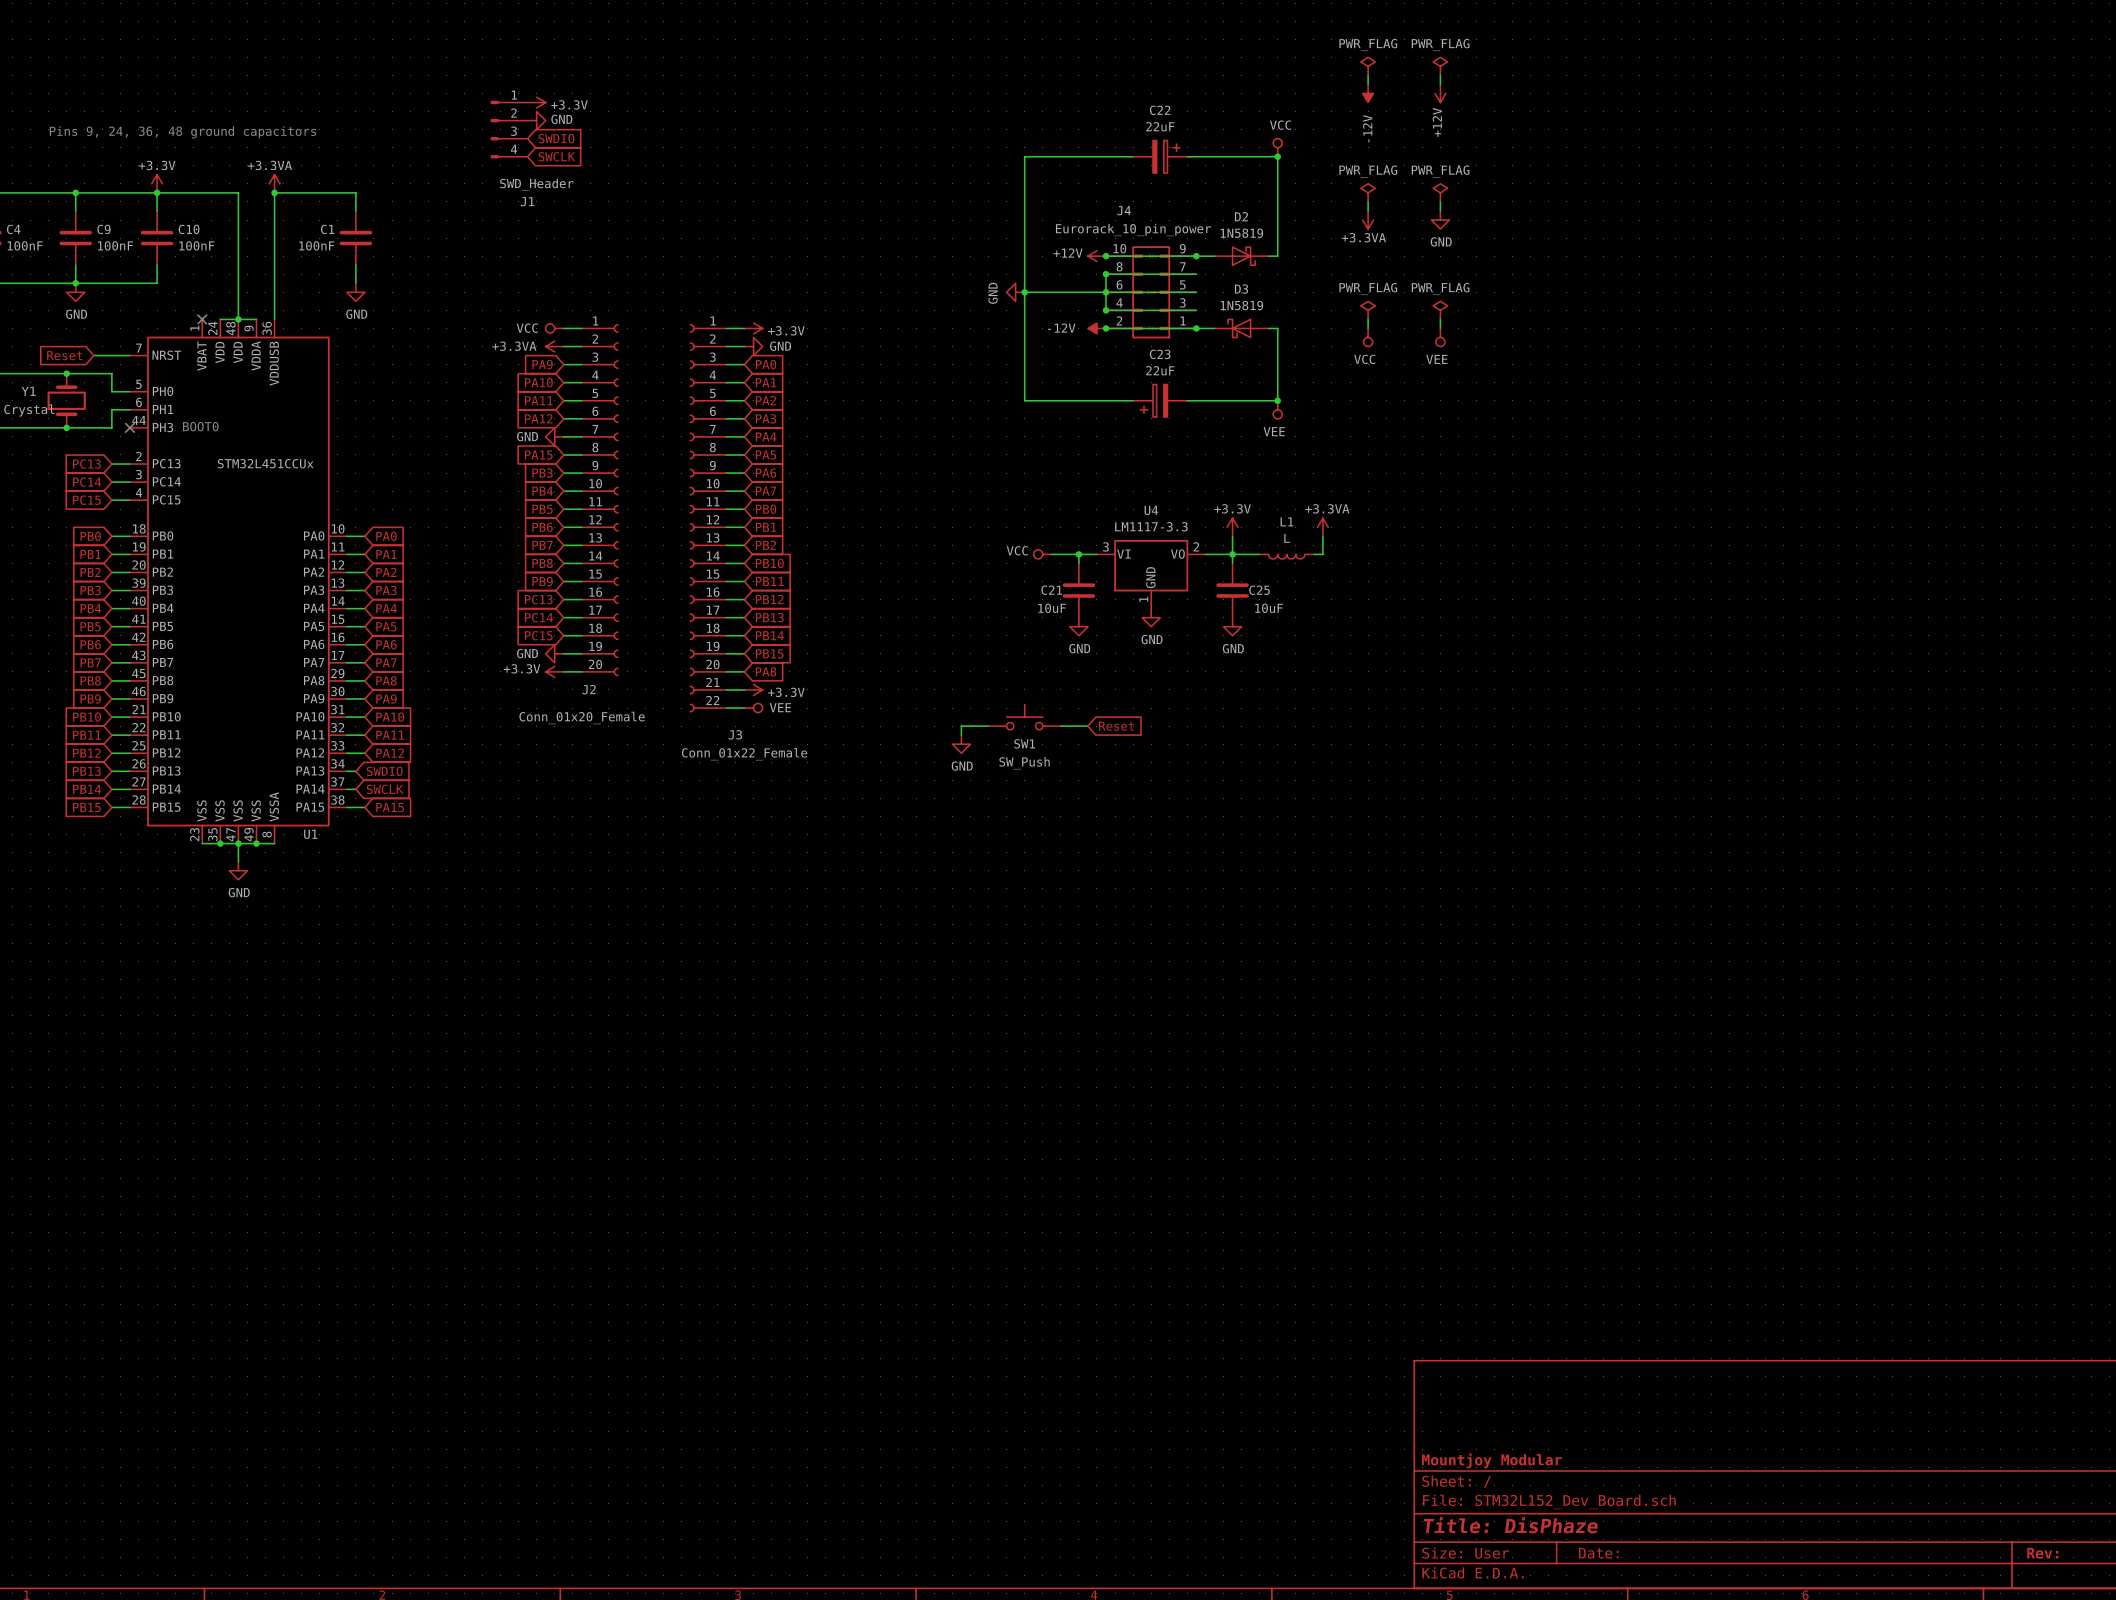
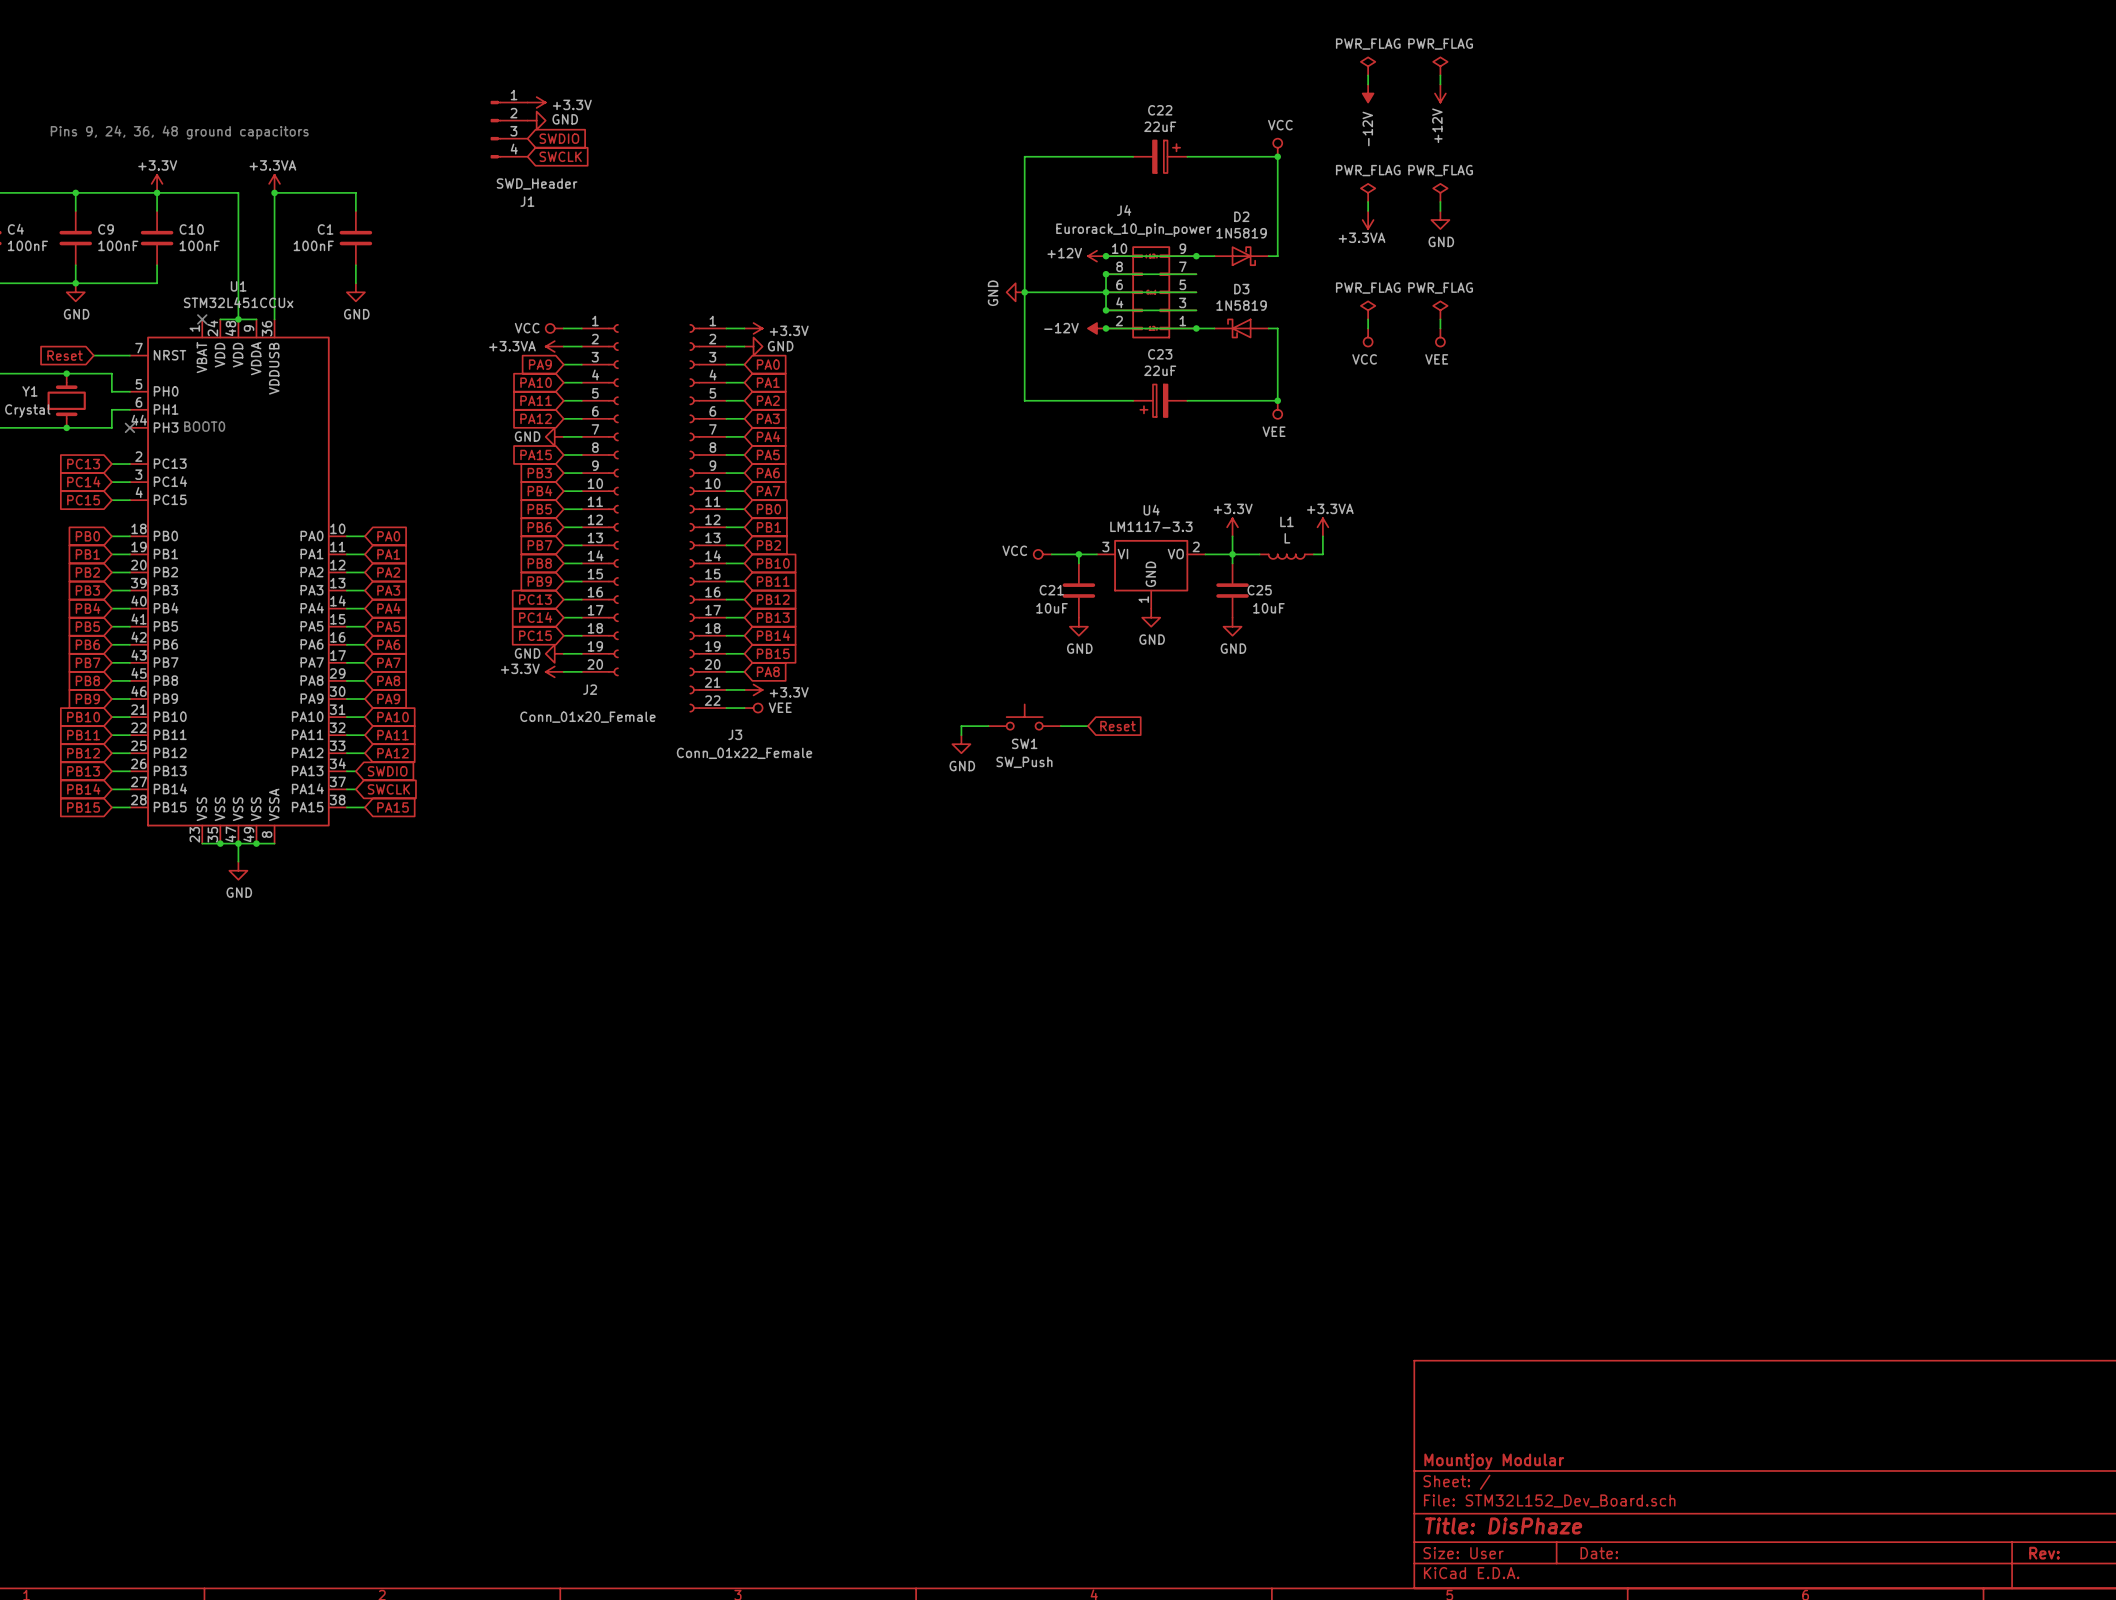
U1 value position: STM32L451CCUx (265, 463) -> STM32L451CCUx (238, 302)
U1 name position: U1 (310, 834) -> U1 (238, 286)

